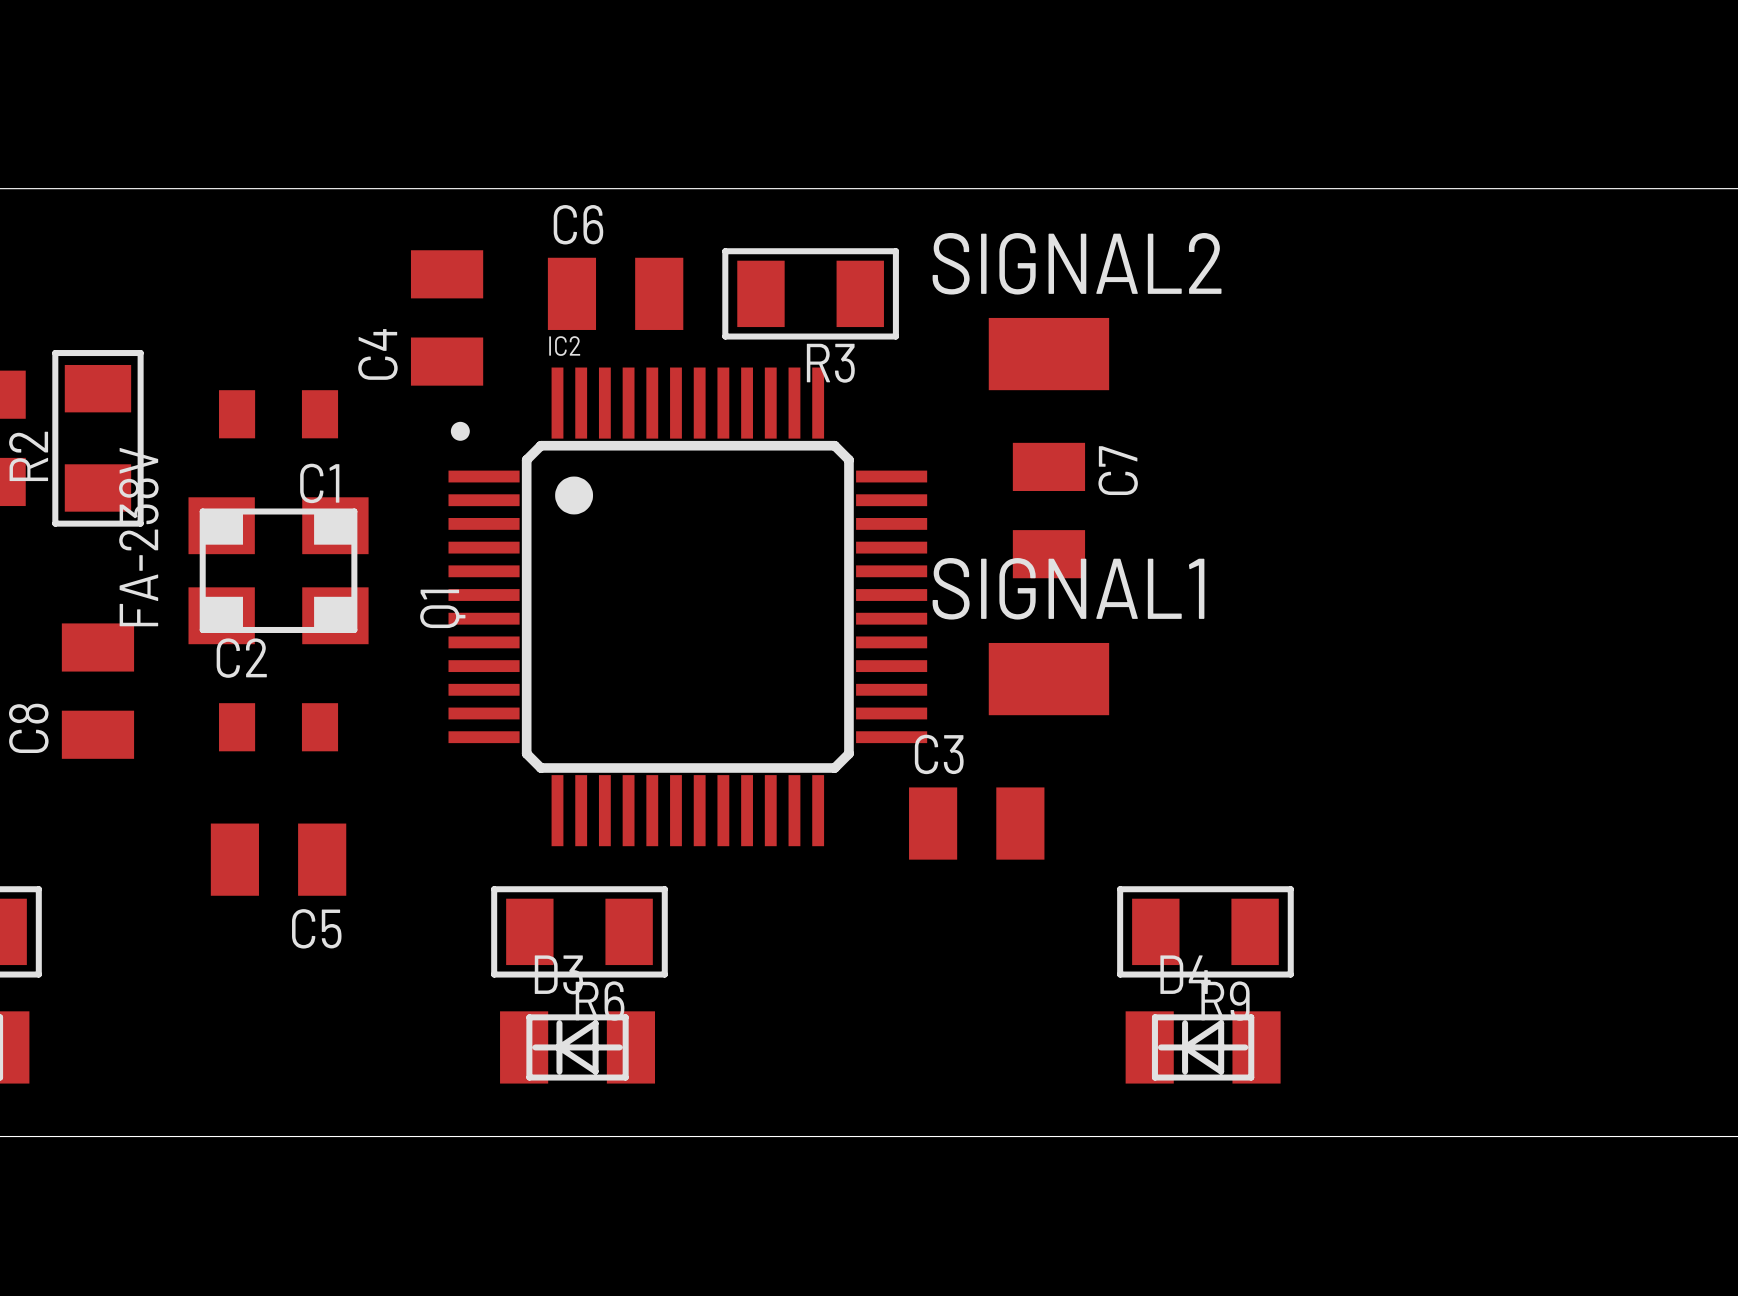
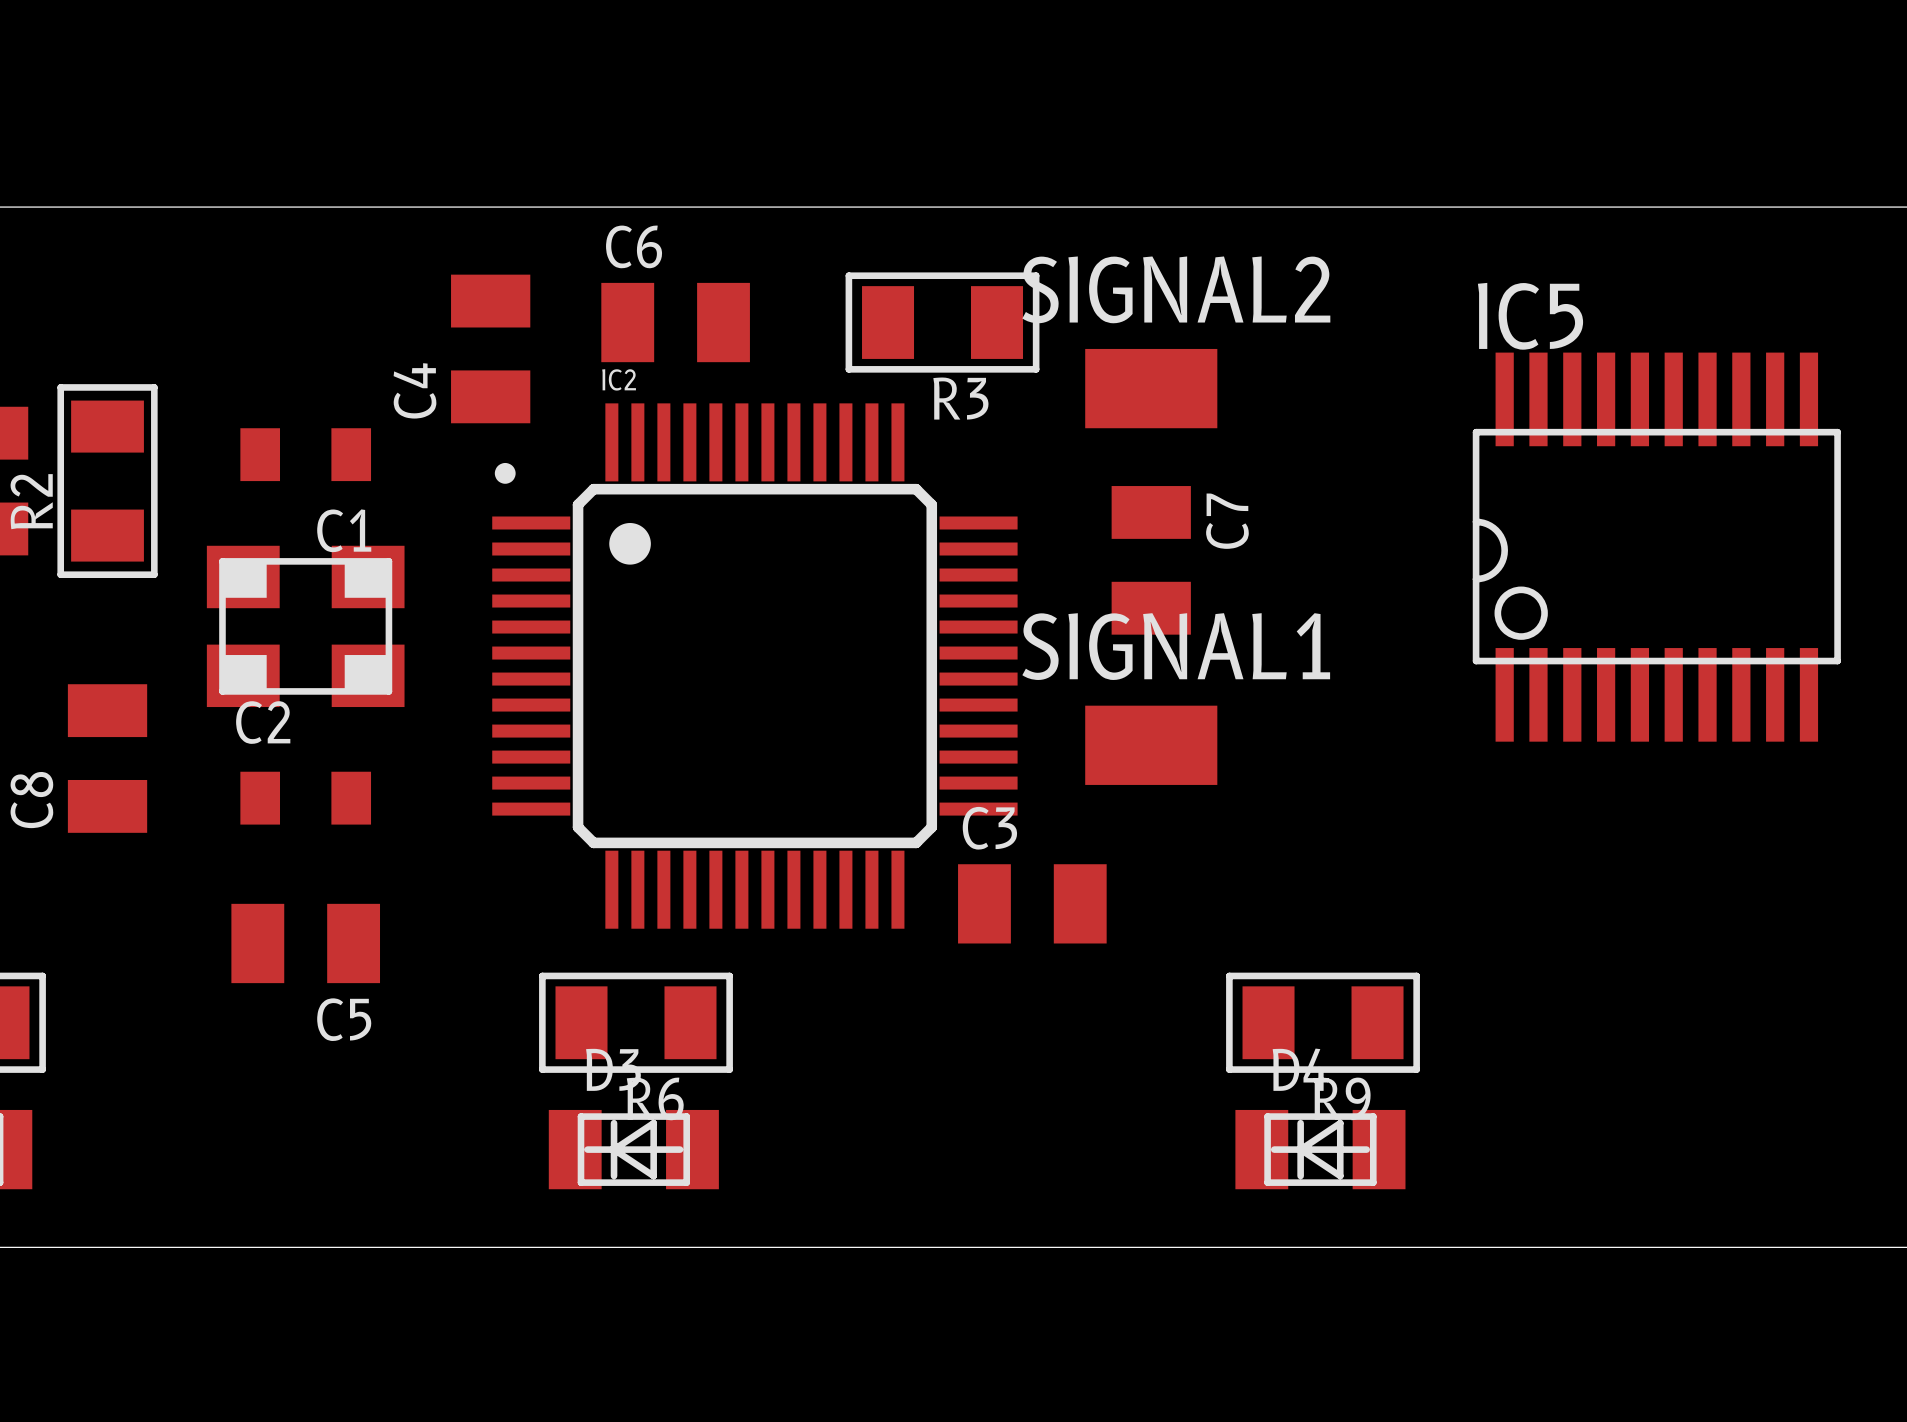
R3 position: (810, 293) -> (942, 322)
IC5: none -> (1656, 547)
Q1 value: FA-238V (138, 537) -> none
Q1 name: Q1 (442, 608) -> none
C3 position: (976, 823) -> (1032, 903)

